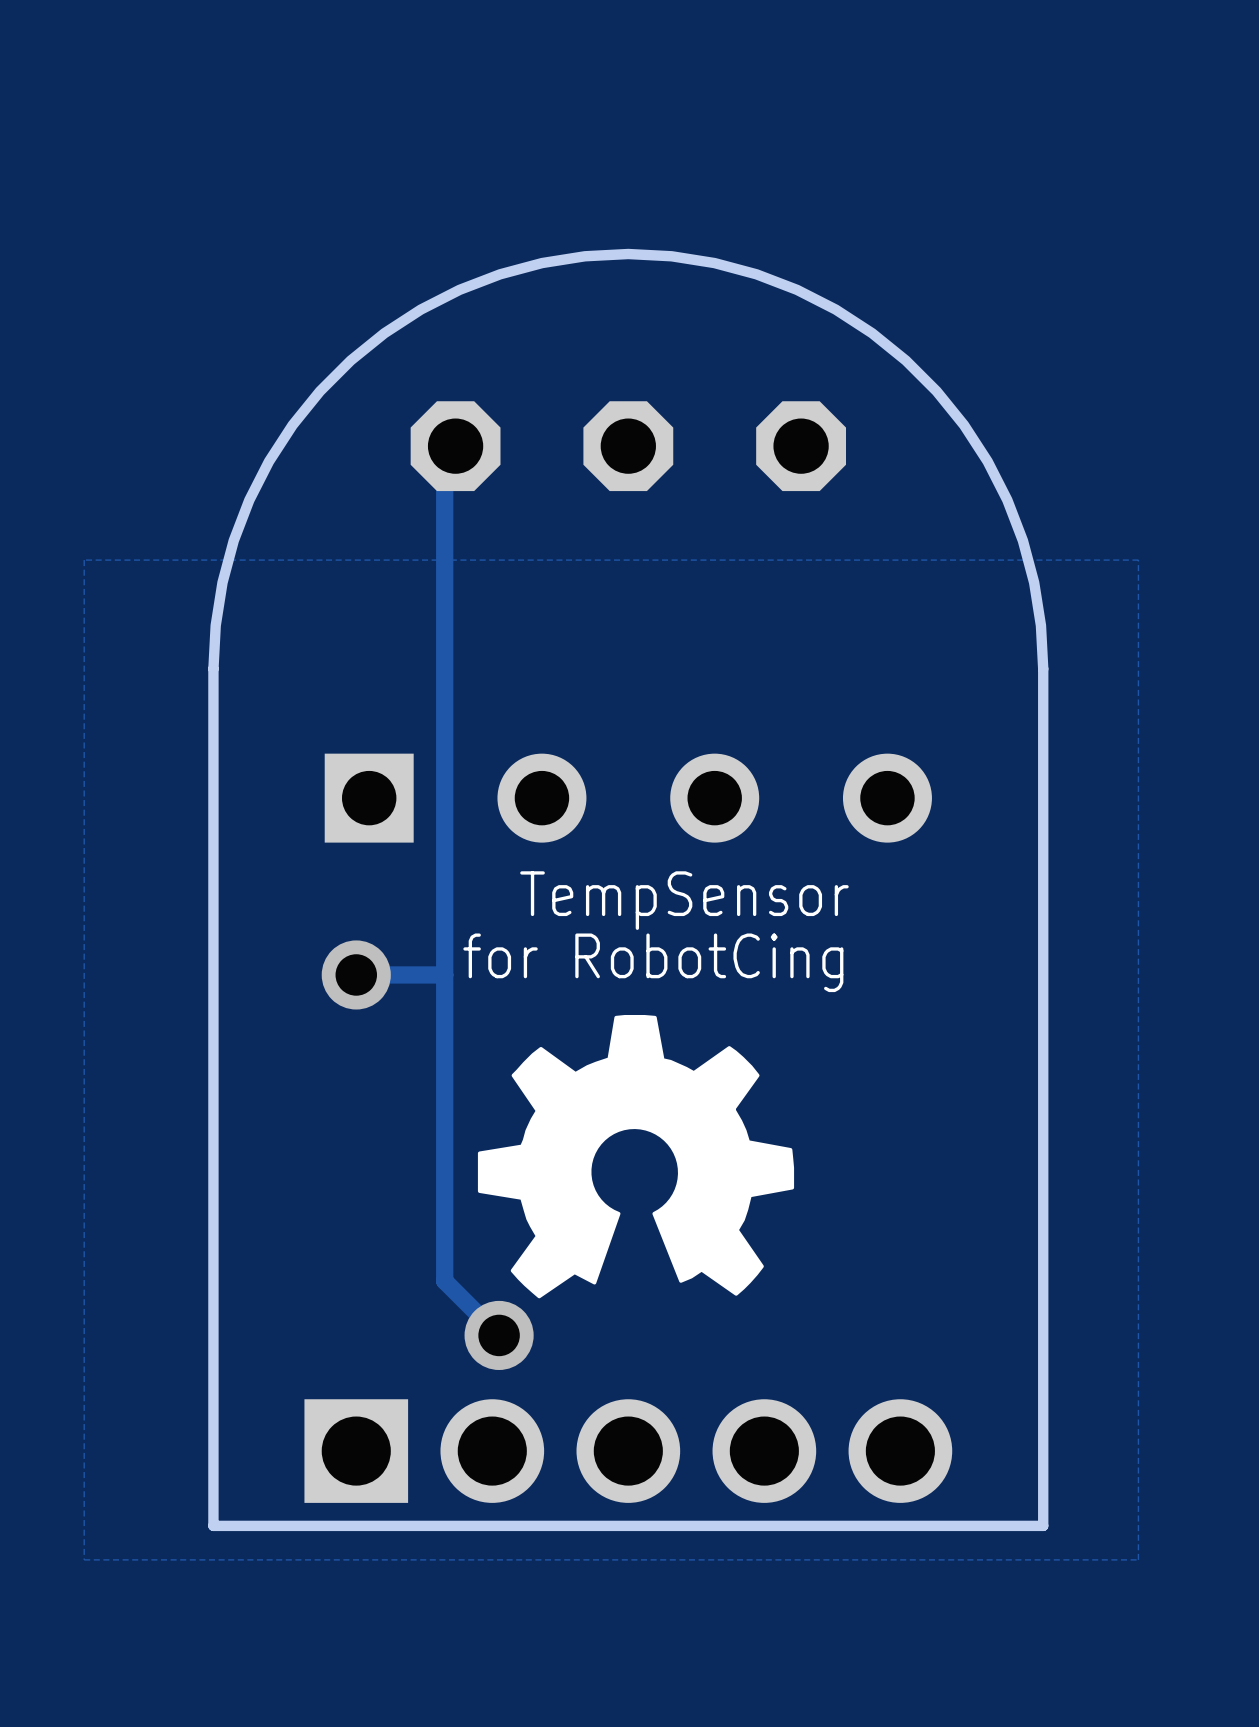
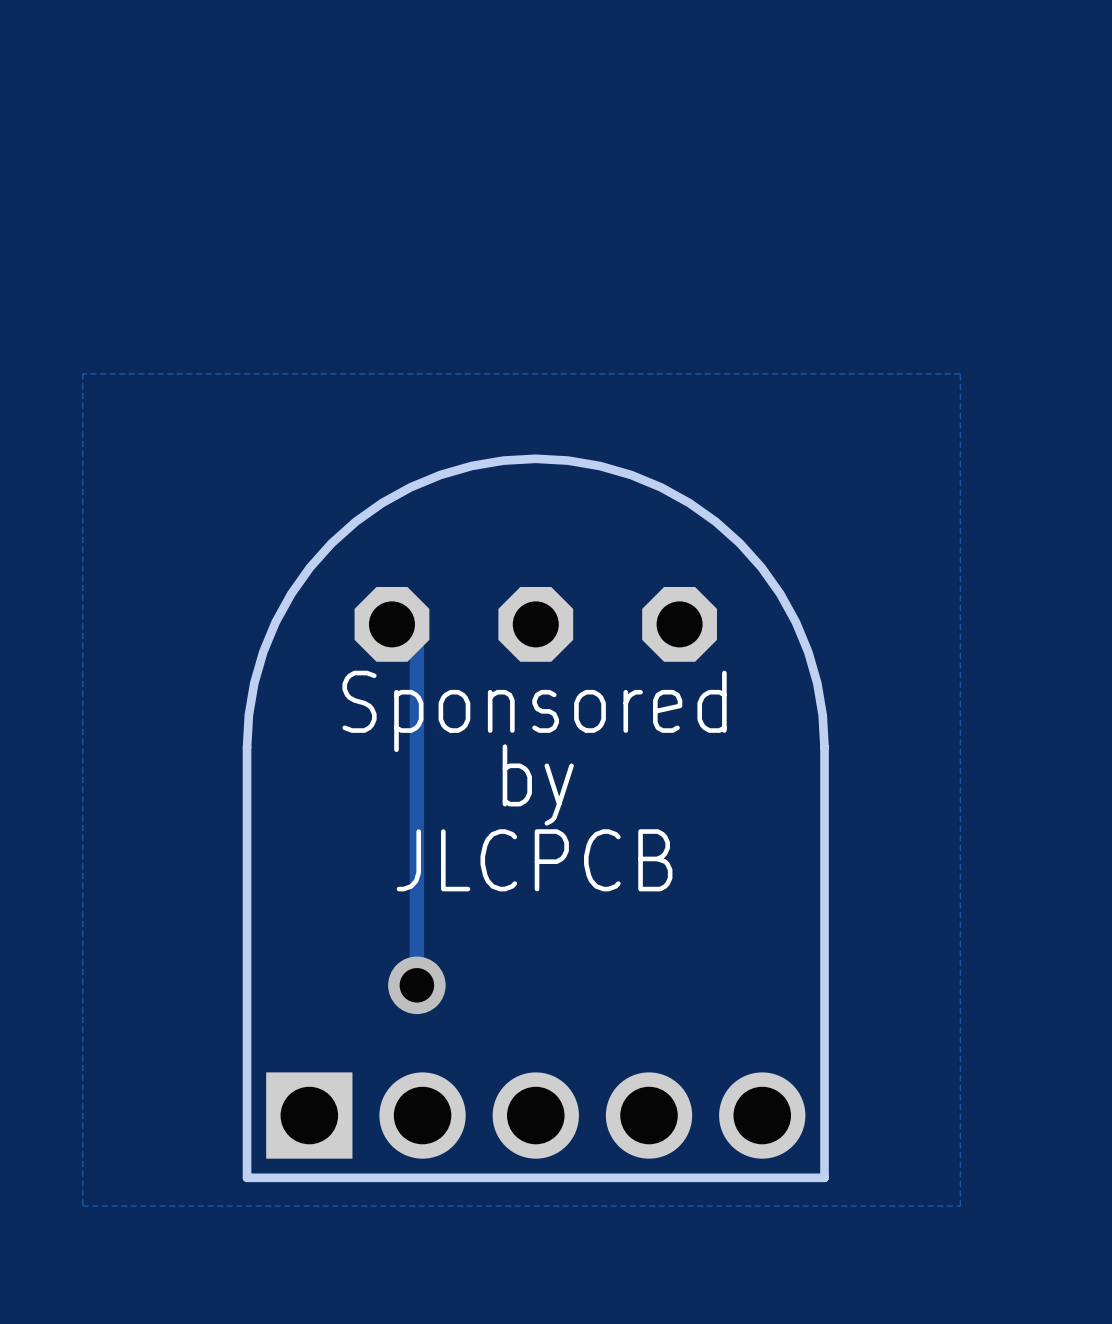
track: (455, 446) (444, 457) (444, 1281) (499, 1335) -> none
part: (628, 446) -> none
part footprint: [324, 753, 932, 843] -> [354, 587, 717, 662]
track: none -> (391, 624) (416, 649) (416, 985)
text: TempSensor (684, 900) -> none
text: for RobotCing (653, 962) -> none
text: none -> Sponsored (534, 711)
via: (356, 974) -> none
track: (444, 974) (356, 974) -> none
drawing: [477, 1015, 795, 1299] -> none
text: none -> by (538, 784)
text: none -> JLCPCB (534, 860)
via position: (499, 1335) -> (416, 985)
board edge: (975, 1525) (1043, 1525) (1043, 668) (1040, 625) (1034, 582) (1022, 540) (1007, 500) (987, 461) (963, 425) (936, 391) (905, 360) (872, 333) (835, 309) (797, 289) (756, 274) (714, 263) (671, 256) (628, 254) (584, 256) (542, 263) (500, 274) (459, 289) (420, 309) (384, 333) (350, 360) (320, 391) (292, 425) (269, 461) (249, 500) (233, 540) (222, 582) (215, 625) (213, 668) (213, 1525) (281, 1525) -> (824, 1177) (824, 747) (822, 715) (817, 683) (808, 652) (795, 622) (780, 593) (761, 567) (739, 543) (715, 521) (689, 503) (661, 487) (631, 474) (600, 466) (568, 460) (535, 458) (503, 460) (471, 466) (440, 474) (410, 487) (382, 503) (355, 521) (331, 543) (310, 567) (291, 593) (275, 622) (263, 652) (254, 683) (248, 715) (247, 747) (247, 1177)

